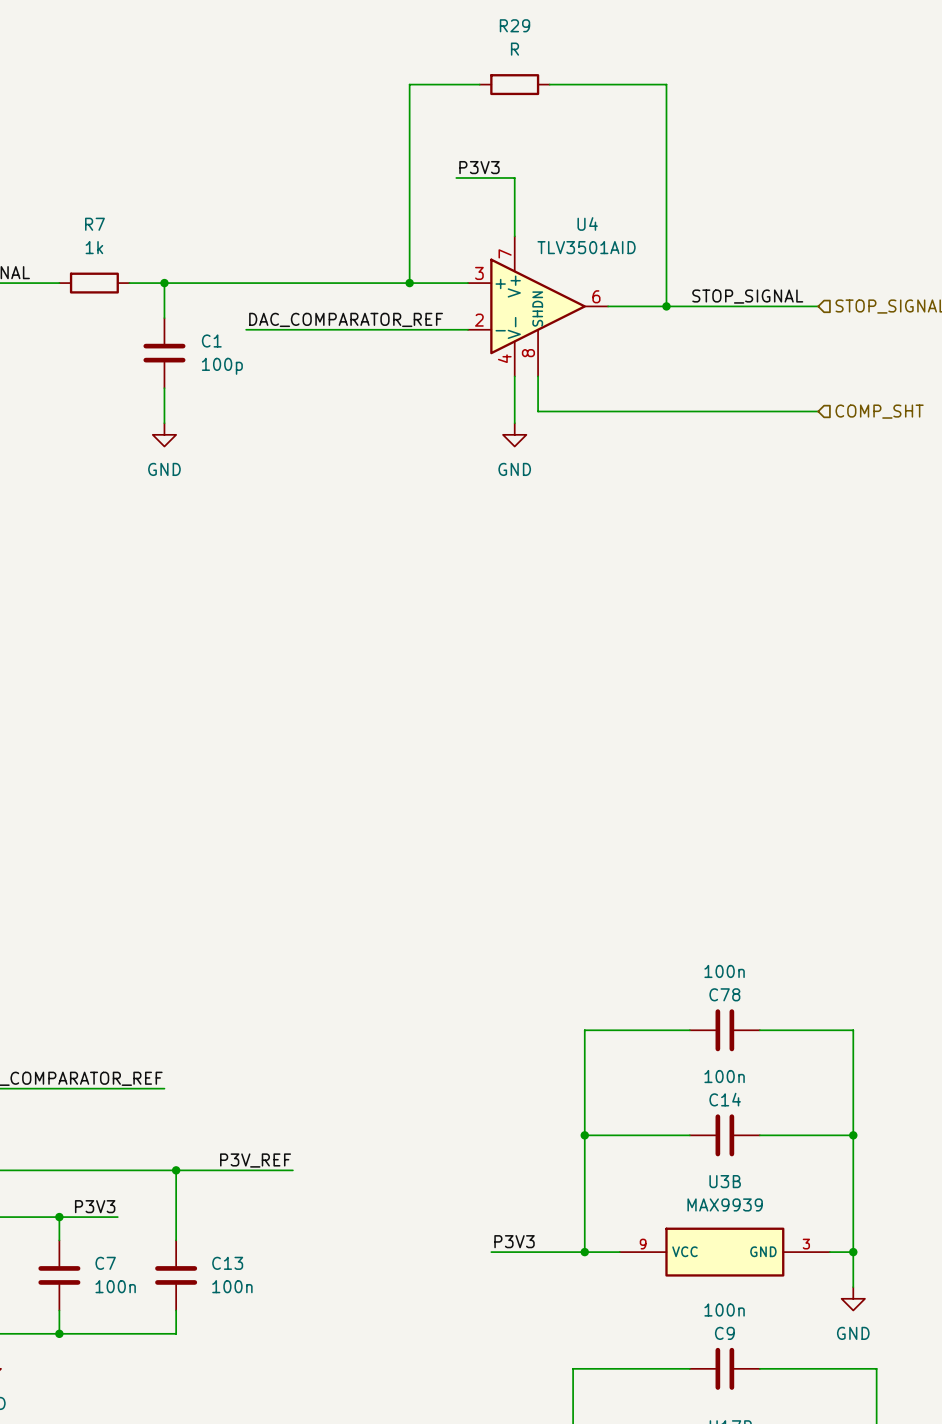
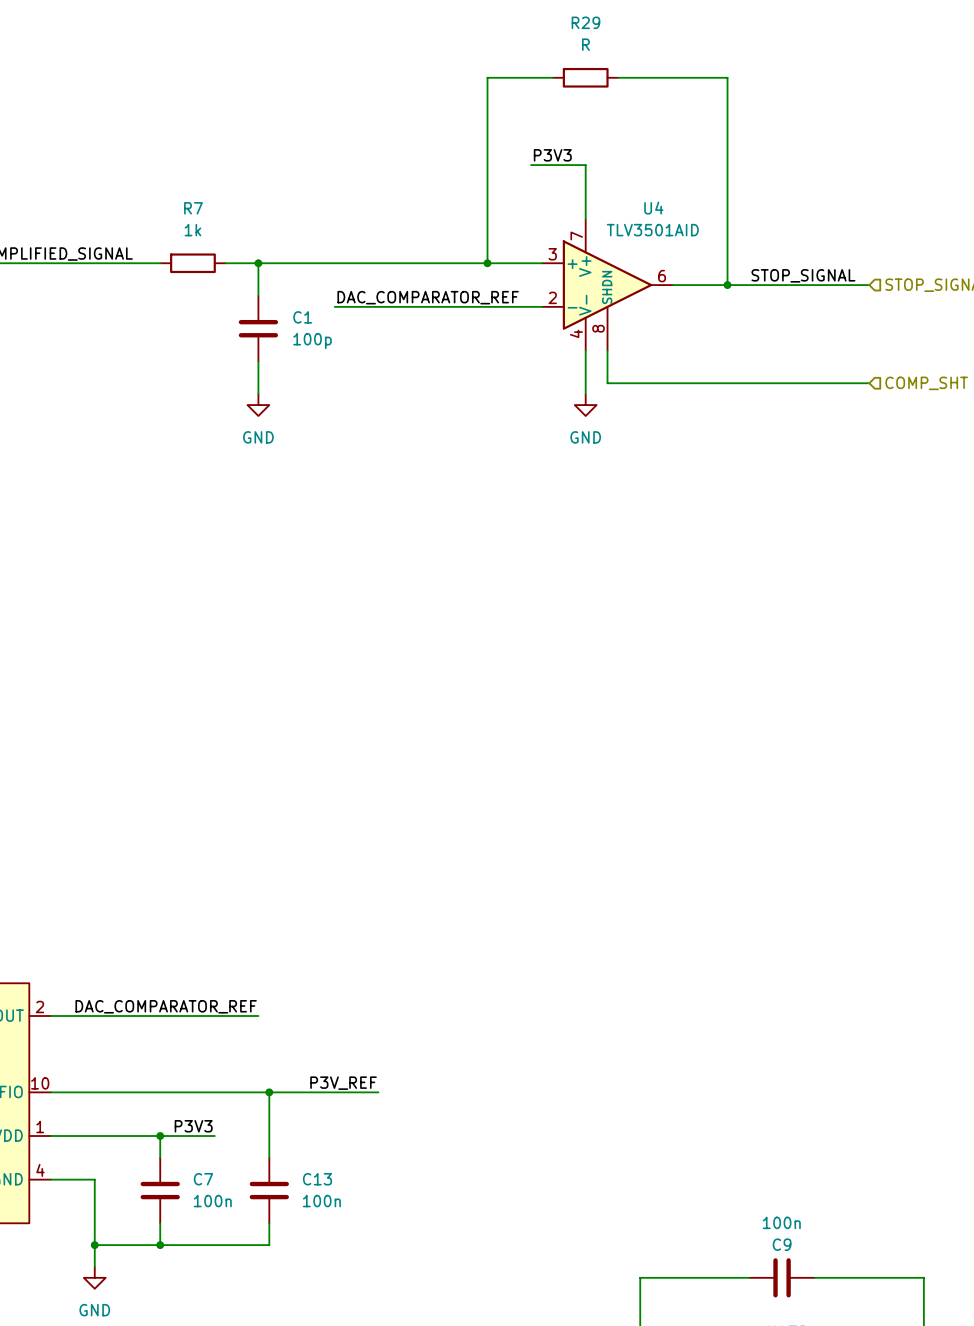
wire: (689, 1030) (584, 1030) (584, 1252) -> none
C78: 100n (724, 1030) -> none
wire: (759, 1030) (853, 1030) (853, 1287) -> none
wire: (584, 1135) (689, 1135) -> none
junction: (584, 1135) -> none
C14: 100n (724, 1135) -> none
wire: (759, 1135) (853, 1135) -> none
junction: (853, 1135) -> none
label: P3V3 (514, 1241) -> none
wire: (491, 1252) (619, 1252) -> none
junction: (584, 1252) -> none
U3B: MAX9939 (724, 1252) -> none
wire: (829, 1252) (853, 1252) -> none
junction: (853, 1252) -> none
power symbol: GND (853, 1298) -> none

